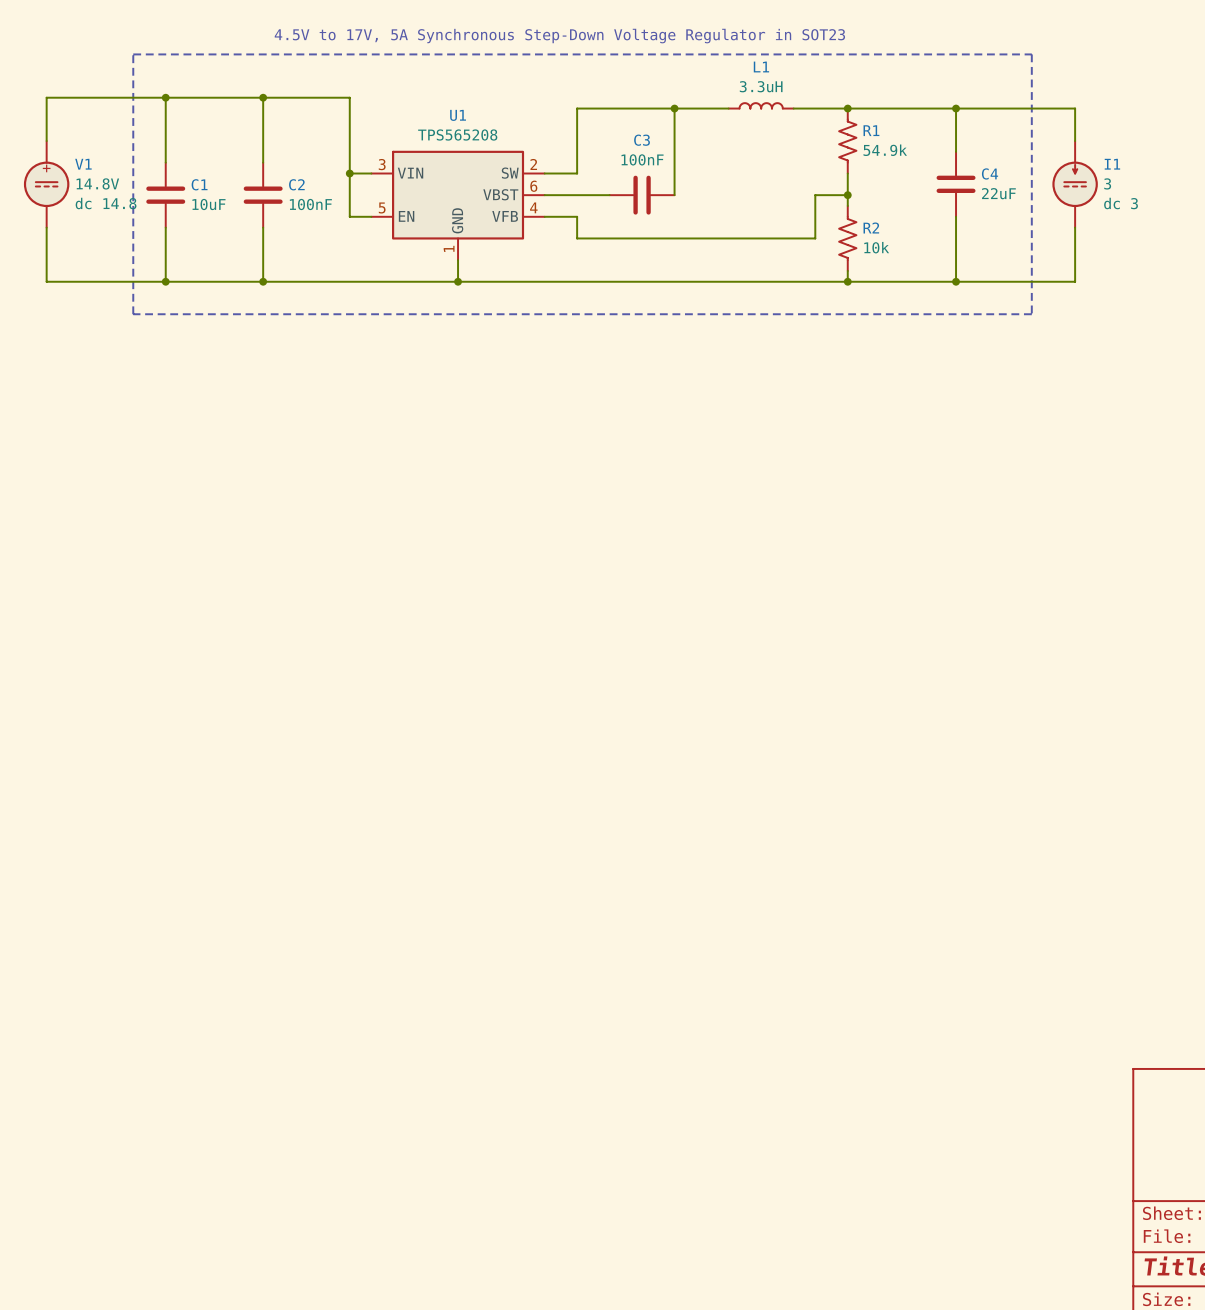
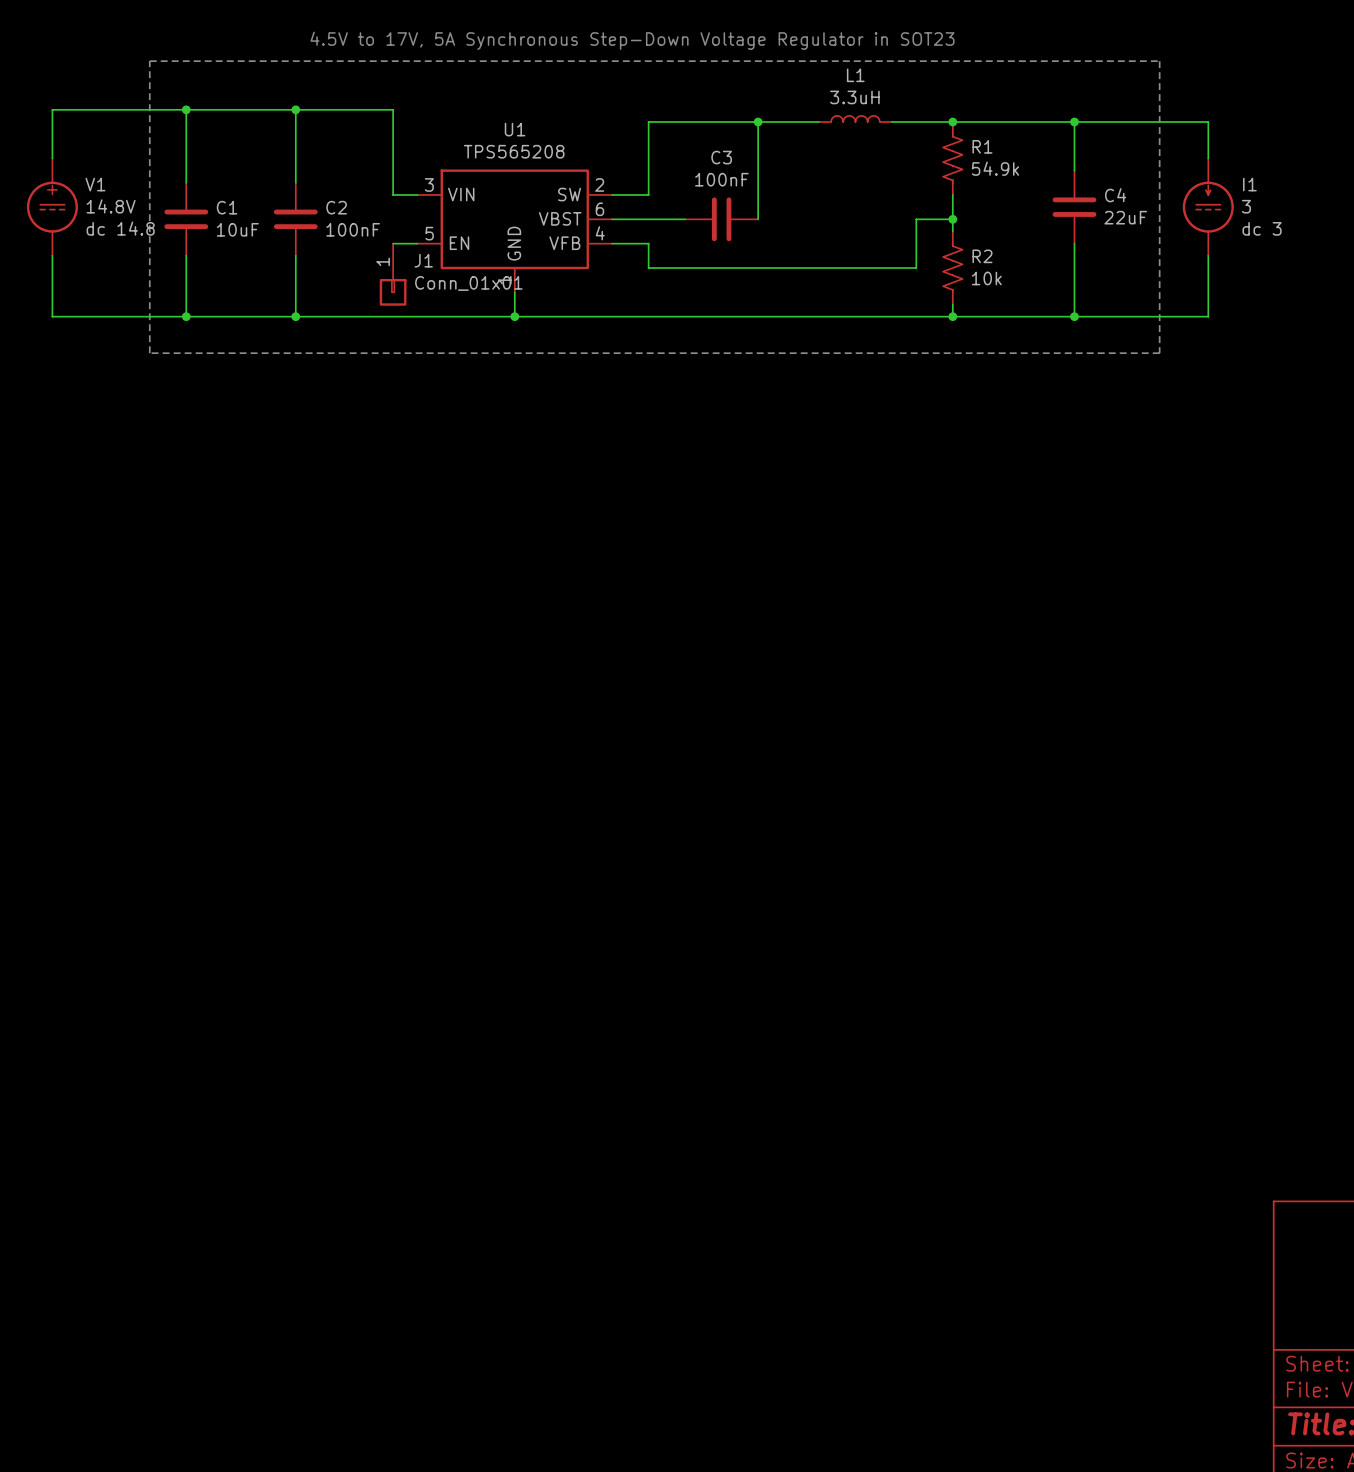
wire: (349, 173) (349, 216) -> none
junction: (349, 173) -> none
J1: none -> Conn_01x01 (393, 274)

